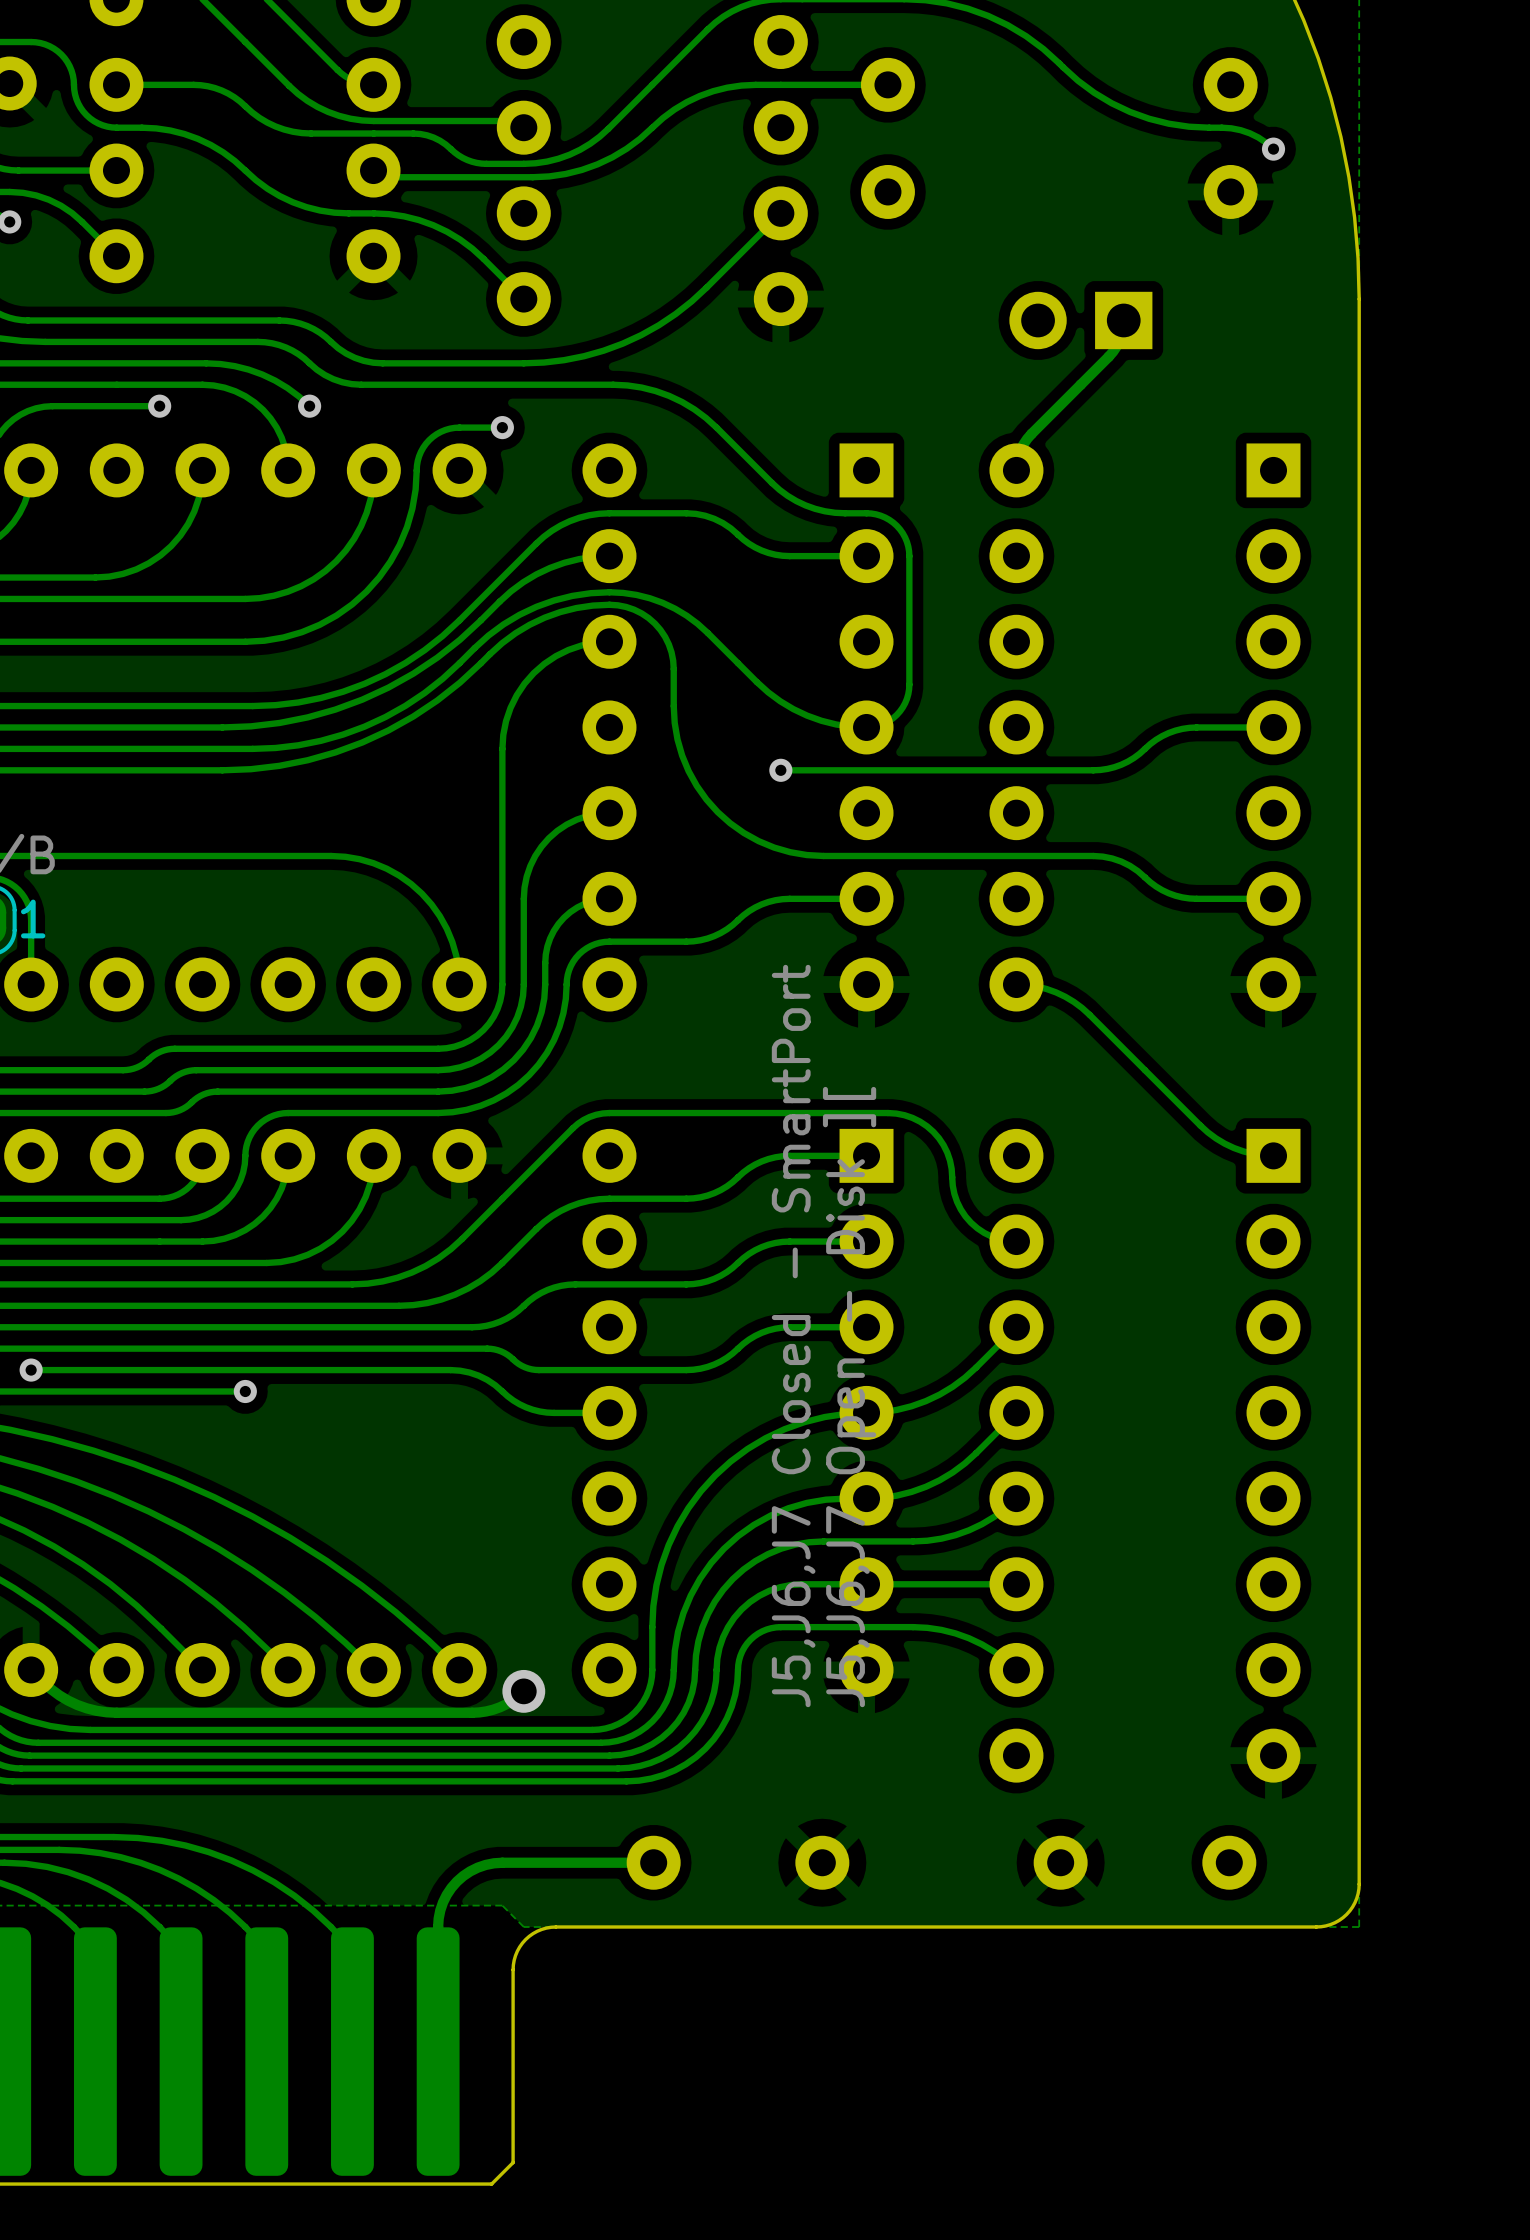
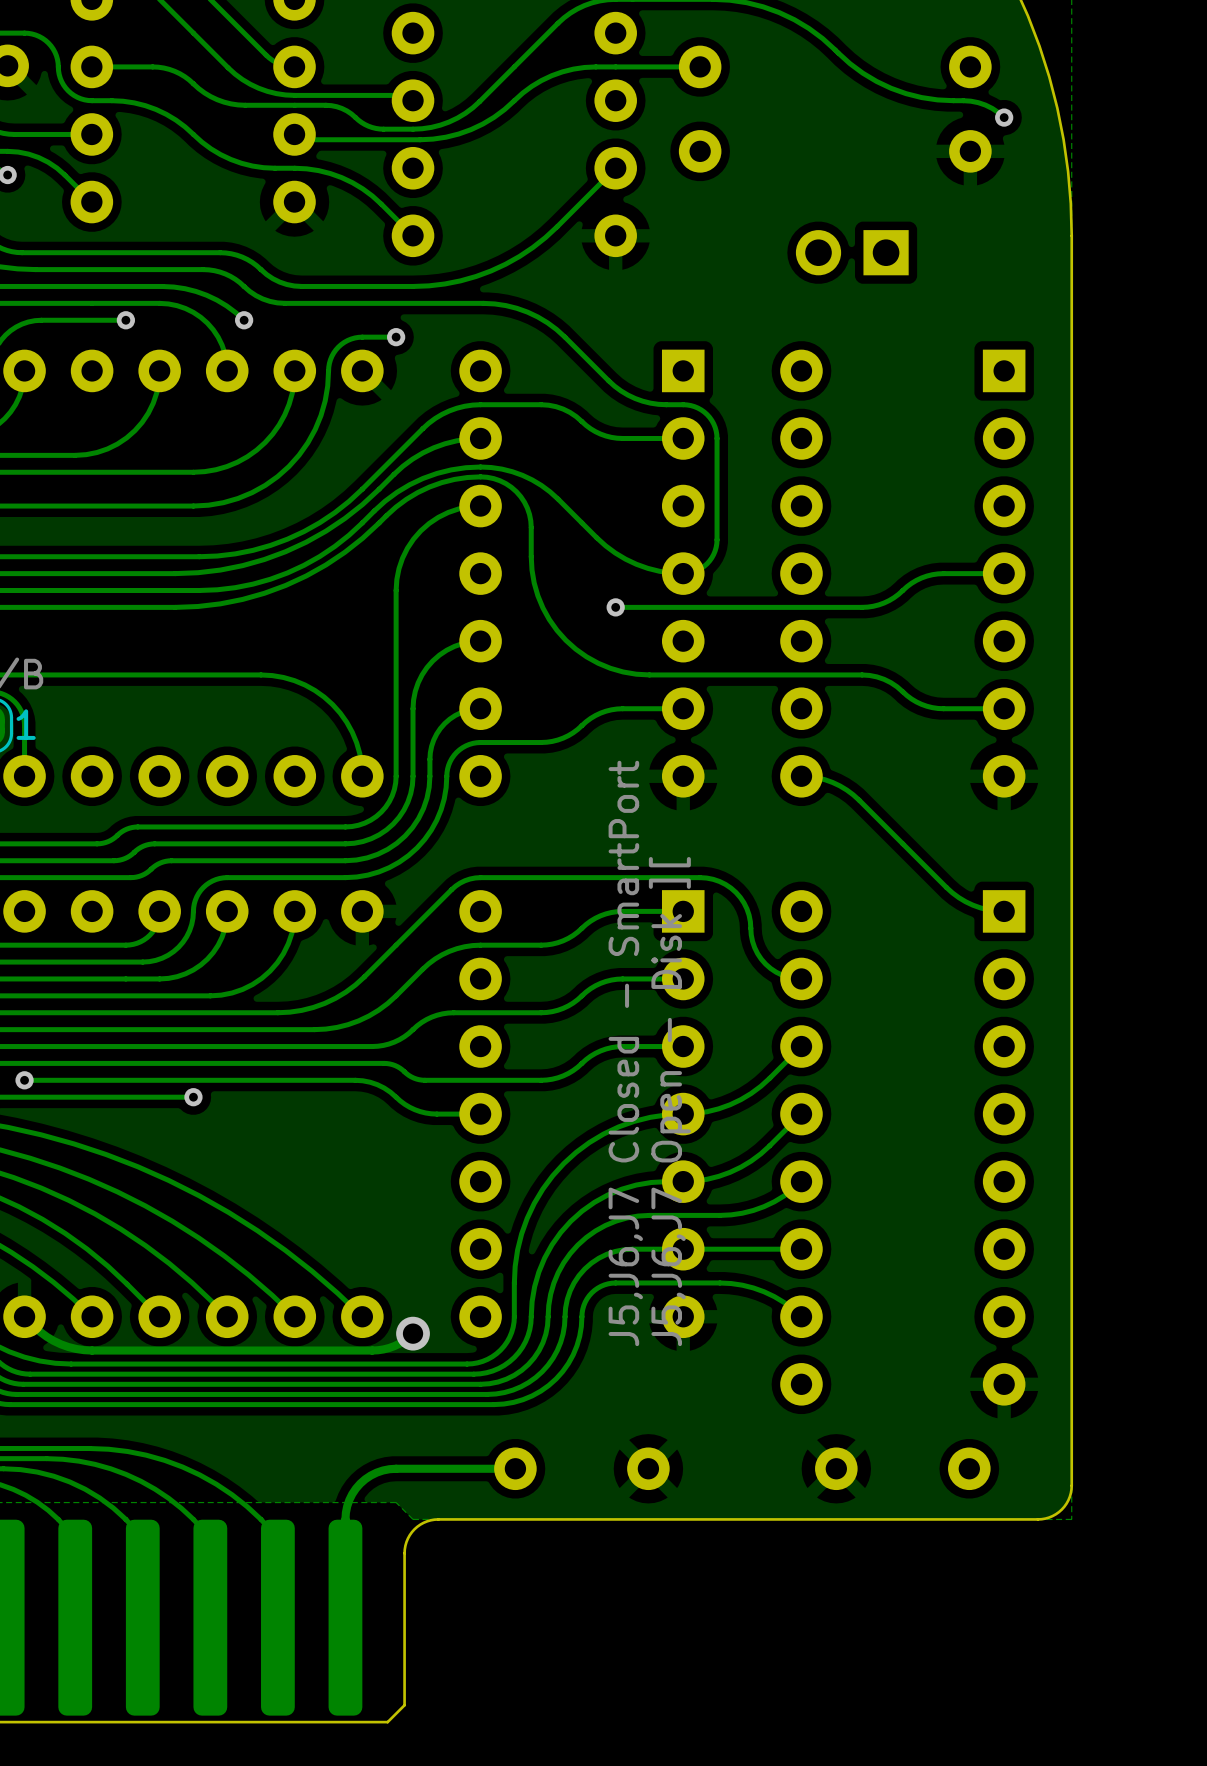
track: (1123, 320) (1121, 333) (1113, 351) (1027, 438) (1018, 457) (1016, 470) -> none

